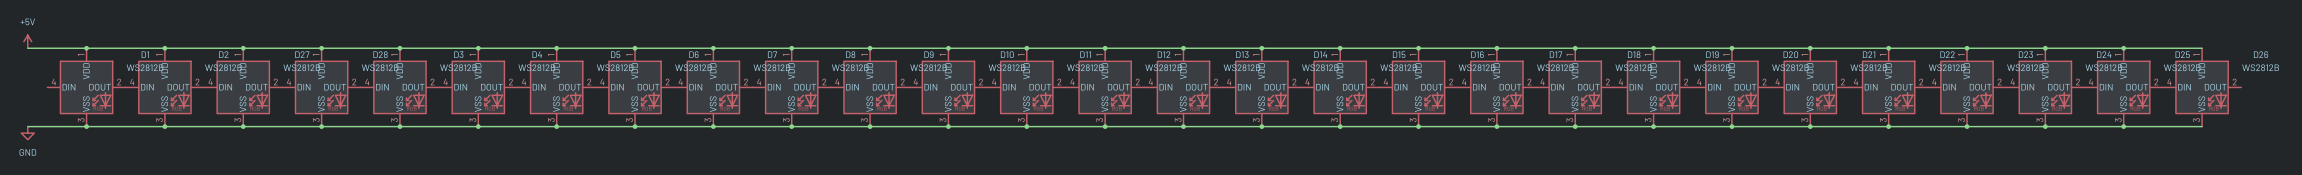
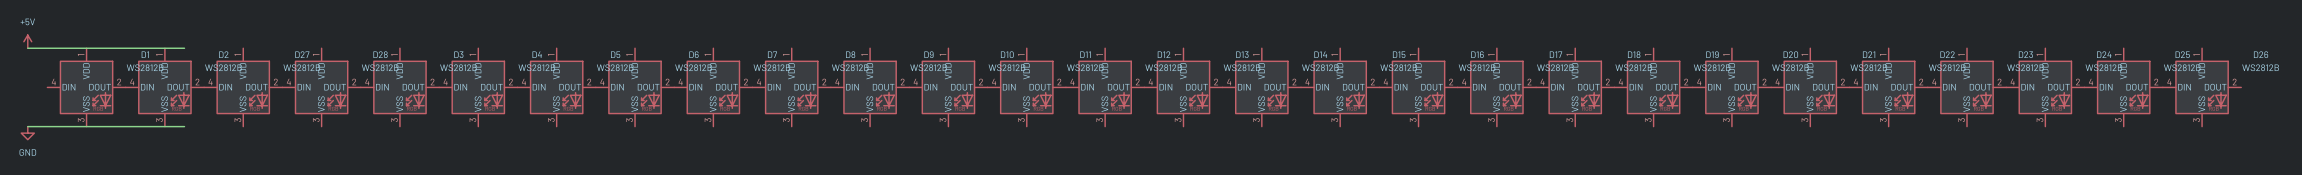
junction: (86, 48) -> none
junction: (164, 48) -> none
wire: (184, 48) (2202, 48) -> none
junction: (243, 48) -> none
junction: (321, 48) -> none
junction: (399, 48) -> none
junction: (478, 48) -> none
junction: (556, 48) -> none
junction: (635, 48) -> none
junction: (713, 48) -> none
junction: (791, 48) -> none
junction: (870, 48) -> none
junction: (948, 48) -> none
junction: (1026, 48) -> none
junction: (1105, 48) -> none
junction: (1183, 48) -> none
junction: (1261, 48) -> none
junction: (1340, 48) -> none
junction: (1418, 48) -> none
junction: (1496, 48) -> none
junction: (1575, 48) -> none
junction: (1653, 48) -> none
junction: (1731, 48) -> none
junction: (1810, 48) -> none
junction: (1888, 48) -> none
junction: (1967, 48) -> none
junction: (2045, 48) -> none
junction: (2123, 48) -> none
junction: (86, 126) -> none
junction: (164, 126) -> none
wire: (184, 126) (2202, 126) -> none
junction: (243, 126) -> none
junction: (321, 126) -> none
junction: (399, 126) -> none
junction: (478, 126) -> none
junction: (556, 126) -> none
junction: (635, 126) -> none
junction: (713, 126) -> none
junction: (791, 126) -> none
junction: (870, 126) -> none
junction: (948, 126) -> none
junction: (1026, 126) -> none
junction: (1105, 126) -> none
junction: (1183, 126) -> none
junction: (1261, 126) -> none
junction: (1340, 126) -> none
junction: (1418, 126) -> none
junction: (1496, 126) -> none
junction: (1575, 126) -> none
junction: (1653, 126) -> none
junction: (1731, 126) -> none
junction: (1810, 126) -> none
junction: (1888, 126) -> none
junction: (1967, 126) -> none
junction: (2045, 126) -> none
junction: (2123, 126) -> none

